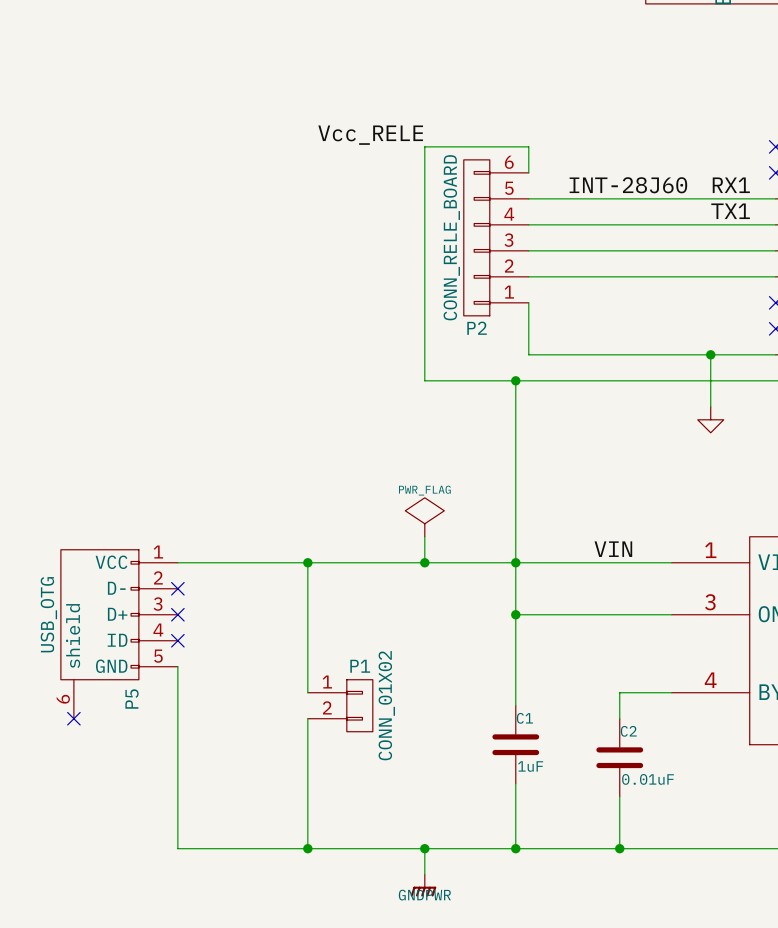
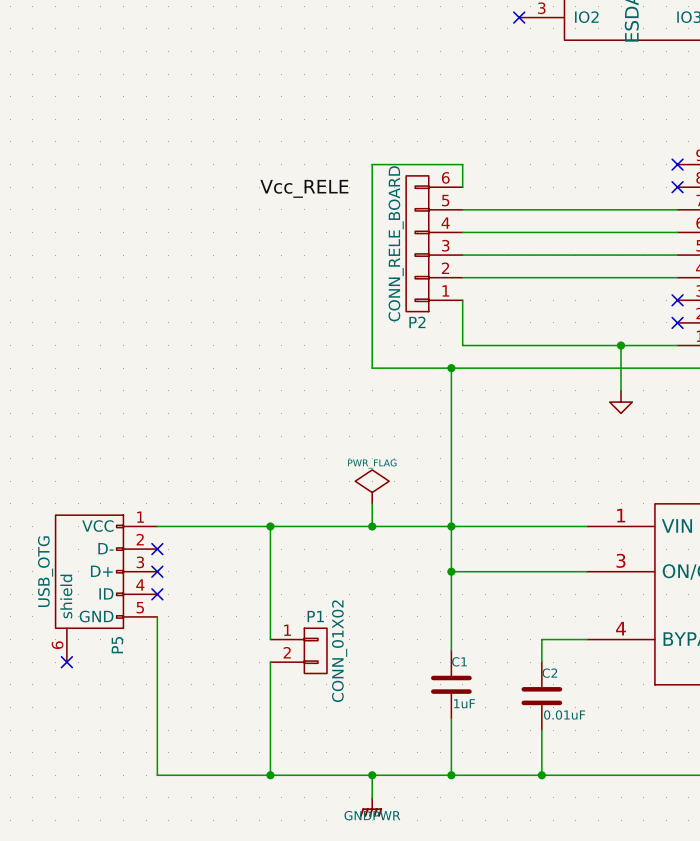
label position: Vcc_RELE (370, 135) -> Vcc_RELE (304, 188)
label: INT-28J60 (628, 185) -> none
label: RX1 (731, 185) -> none
label: TX1 (730, 211) -> none
label: VIN (613, 549) -> none

